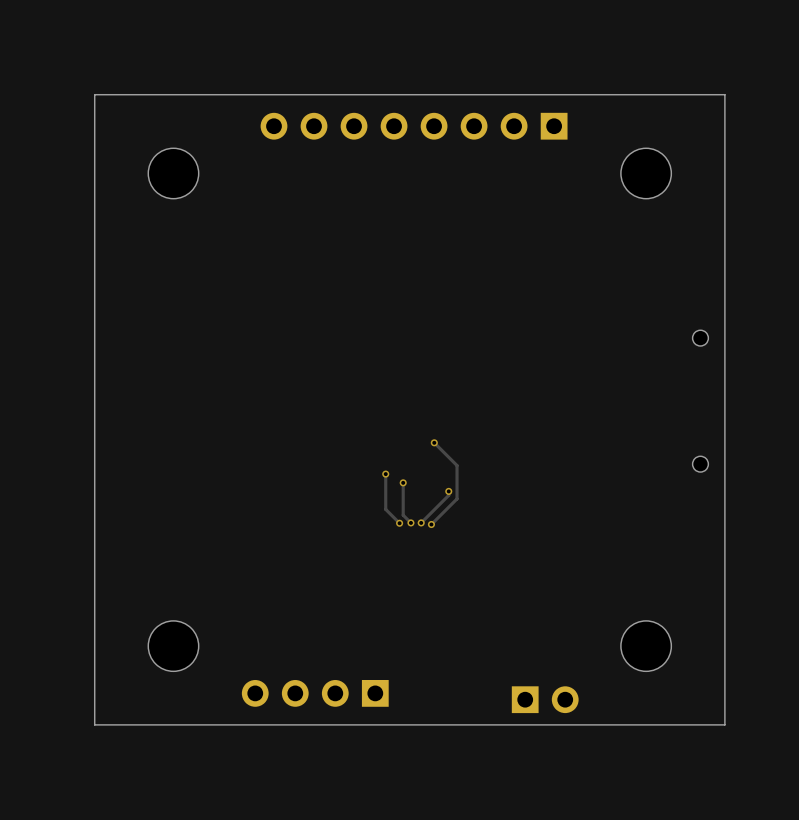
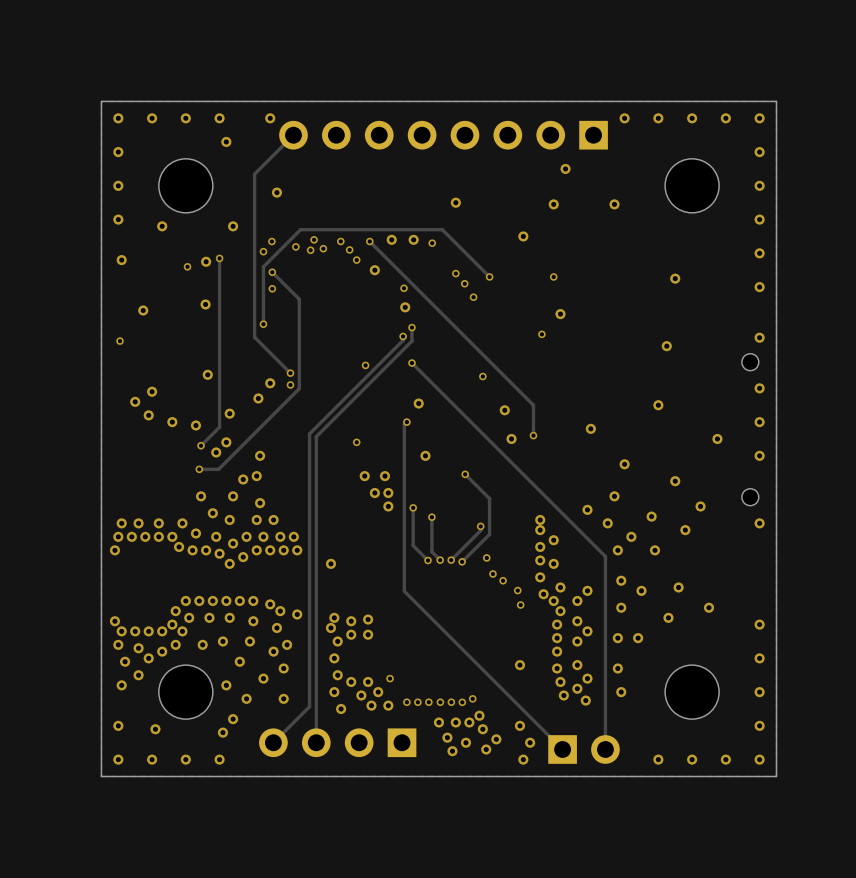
via: none -> (118, 118)
via: none -> (152, 118)
via: none -> (185, 118)
via: none -> (219, 118)
via: none -> (270, 118)
via: none -> (624, 118)
via: none -> (658, 118)
via: none -> (692, 118)
via: none -> (725, 118)
via: none -> (759, 118)
track: none -> (293, 135) (254, 174) (254, 337) (290, 373)
via: none -> (226, 141)
via: none -> (118, 152)
via: none -> (759, 152)
via: none -> (565, 168)
via: none -> (118, 185)
via: none -> (759, 185)
via: none -> (276, 192)
via: none -> (455, 202)
via: none -> (553, 204)
via: none -> (614, 204)
via: none -> (118, 219)
via: none -> (759, 219)
via: none -> (162, 226)
via: none -> (233, 226)
via: none -> (523, 236)
via: none -> (314, 239)
via: none -> (391, 239)
via: none -> (413, 239)
via: none -> (271, 241)
via: none -> (340, 241)
track: none -> (369, 241) (533, 405) (533, 435)
via: none -> (369, 241)
via: none -> (432, 243)
via: none -> (295, 246)
via: none -> (323, 248)
via: none -> (310, 250)
via: none -> (349, 249)
via: none -> (263, 251)
via: none -> (759, 253)
track: none -> (219, 258) (219, 427) (201, 445)
via: none -> (219, 258)
via: none -> (121, 260)
via: none -> (356, 260)
via: none -> (206, 261)
via: none -> (187, 266)
via: none -> (374, 270)
track: none -> (272, 272) (299, 299) (299, 388) (218, 469) (199, 469)
via: none -> (272, 272)
via: none -> (455, 273)
track: none -> (489, 276) (442, 229) (300, 229) (263, 266) (263, 324)
via: none -> (489, 276)
via: none -> (553, 276)
via: none -> (675, 278)
via: none -> (464, 283)
via: none -> (759, 287)
via: none -> (272, 288)
via: none -> (404, 288)
via: none -> (473, 297)
via: none -> (205, 304)
via: none -> (405, 307)
via: none -> (143, 310)
via: none -> (560, 314)
via: none -> (263, 324)
track: none -> (411, 327) (411, 341) (316, 436) (316, 742)
via: none -> (411, 327)
via: none -> (541, 334)
track: none -> (403, 336) (403, 340) (309, 433) (309, 706) (273, 742)
via: none -> (403, 336)
via: none -> (759, 337)
via: none -> (120, 341)
via: none -> (666, 346)
track: none -> (411, 363) (605, 556) (605, 749)
via: none -> (411, 363)
via: none -> (365, 365)
via: none -> (290, 373)
via: none -> (207, 374)
via: none -> (482, 376)
via: none -> (270, 383)
via: none -> (290, 384)
via: none -> (759, 388)
via: none -> (152, 391)
via: none -> (258, 398)
via: none -> (135, 401)
via: none -> (418, 403)
via: none -> (658, 405)
via: none -> (504, 410)
via: none -> (229, 413)
via: none -> (148, 415)
via: none -> (172, 422)
track: none -> (406, 422) (404, 424) (404, 591) (562, 749)
via: none -> (406, 422)
via: none -> (759, 422)
via: none -> (195, 425)
via: none -> (590, 428)
via: none -> (533, 435)
via: none -> (511, 438)
via: none -> (717, 438)
via: none -> (226, 442)
via: none -> (356, 442)
via: none -> (201, 445)
via: none -> (216, 452)
via: none -> (260, 455)
via: none -> (425, 455)
via: none -> (759, 455)
via: none -> (624, 464)
via: none -> (199, 469)
via: none -> (256, 476)
via: none -> (364, 476)
via: none -> (384, 476)
via: none -> (243, 479)
via: none -> (675, 481)
via: none -> (374, 492)
via: none -> (388, 492)
via: none -> (201, 496)
via: none -> (233, 496)
via: none -> (614, 496)
via: none -> (260, 503)
via: none -> (388, 506)
via: none -> (700, 506)
via: none -> (587, 509)
via: none -> (212, 513)
via: none -> (651, 516)
via: none -> (229, 519)
via: none -> (256, 519)
via: none -> (273, 519)
via: none -> (540, 519)
via: none -> (121, 523)
via: none -> (138, 523)
via: none -> (158, 523)
via: none -> (182, 523)
via: none -> (607, 523)
via: none -> (759, 523)
via: none -> (540, 530)
via: none -> (685, 530)
via: none -> (195, 533)
via: none -> (118, 536)
via: none -> (131, 536)
via: none -> (145, 536)
via: none -> (158, 536)
via: none -> (172, 536)
via: none -> (216, 536)
via: none -> (246, 536)
via: none -> (263, 536)
via: none -> (280, 536)
via: none -> (293, 536)
via: none -> (631, 536)
via: none -> (553, 540)
via: none -> (233, 543)
via: none -> (179, 546)
via: none -> (540, 546)
via: none -> (114, 550)
via: none -> (192, 550)
via: none -> (206, 550)
via: none -> (256, 550)
via: none -> (270, 550)
via: none -> (283, 550)
via: none -> (297, 550)
via: none -> (617, 550)
via: none -> (654, 550)
via: none -> (219, 553)
via: none -> (243, 557)
via: none -> (486, 557)
via: none -> (540, 560)
via: none -> (229, 563)
via: none -> (330, 563)
via: none -> (553, 563)
via: none -> (492, 573)
via: none -> (540, 577)
via: none -> (503, 580)
via: none -> (621, 580)
via: none -> (560, 587)
via: none -> (678, 587)
via: none -> (517, 590)
via: none -> (587, 590)
via: none -> (641, 590)
via: none -> (543, 594)
via: none -> (185, 600)
via: none -> (199, 600)
via: none -> (212, 600)
via: none -> (226, 600)
via: none -> (239, 600)
via: none -> (253, 600)
via: none -> (553, 600)
via: none -> (577, 600)
via: none -> (270, 604)
via: none -> (520, 605)
via: none -> (621, 607)
via: none -> (708, 607)
via: none -> (175, 611)
via: none -> (280, 611)
via: none -> (560, 611)
via: none -> (297, 614)
via: none -> (189, 617)
via: none -> (209, 617)
via: none -> (229, 617)
via: none -> (334, 617)
via: none -> (668, 617)
via: none -> (368, 619)
via: none -> (114, 621)
via: none -> (253, 621)
via: none -> (351, 621)
via: none -> (577, 621)
via: none -> (172, 624)
via: none -> (557, 624)
via: none -> (759, 624)
via: none -> (276, 627)
via: none -> (330, 627)
via: none -> (121, 631)
via: none -> (135, 631)
via: none -> (148, 631)
via: none -> (162, 631)
via: none -> (182, 631)
via: none -> (587, 631)
via: none -> (351, 634)
via: none -> (368, 634)
via: none -> (557, 638)
via: none -> (617, 638)
via: none -> (638, 638)
via: none -> (222, 641)
via: none -> (249, 641)
via: none -> (337, 641)
via: none -> (577, 641)
via: none -> (118, 644)
via: none -> (175, 644)
via: none -> (202, 644)
via: none -> (287, 644)
via: none -> (138, 648)
via: none -> (162, 651)
via: none -> (273, 651)
via: none -> (557, 651)
via: none -> (148, 658)
via: none -> (334, 658)
via: none -> (759, 658)
via: none -> (125, 661)
via: none -> (239, 661)
via: none -> (519, 665)
via: none -> (577, 665)
via: none -> (283, 668)
via: none -> (557, 668)
via: none -> (617, 668)
via: none -> (138, 675)
via: none -> (337, 675)
via: none -> (263, 678)
via: none -> (390, 678)
via: none -> (587, 678)
via: none -> (351, 681)
via: none -> (368, 681)
via: none -> (560, 681)
via: none -> (121, 685)
via: none -> (226, 685)
via: none -> (577, 688)
via: none -> (334, 692)
via: none -> (378, 692)
via: none -> (621, 692)
via: none -> (759, 692)
via: none -> (361, 695)
via: none -> (563, 695)
via: none -> (246, 698)
via: none -> (283, 698)
via: none -> (472, 698)
via: none -> (585, 700)
via: none -> (406, 702)
via: none -> (417, 702)
via: none -> (428, 702)
via: none -> (440, 702)
via: none -> (451, 702)
via: none -> (462, 702)
via: none -> (371, 705)
via: none -> (388, 705)
via: none -> (341, 708)
via: none -> (479, 715)
via: none -> (233, 719)
via: none -> (438, 722)
via: none -> (455, 722)
via: none -> (469, 722)
via: none -> (118, 725)
via: none -> (519, 725)
via: none -> (759, 725)
via: none -> (155, 729)
via: none -> (482, 729)
via: none -> (222, 732)
via: none -> (447, 737)
via: none -> (496, 739)
via: none -> (465, 742)
via: none -> (530, 742)
via: none -> (486, 749)
via: none -> (452, 751)
via: none -> (118, 759)
via: none -> (152, 759)
via: none -> (185, 759)
via: none -> (219, 759)
via: none -> (523, 759)
via: none -> (658, 759)
via: none -> (692, 759)
via: none -> (725, 759)
via: none -> (759, 759)

